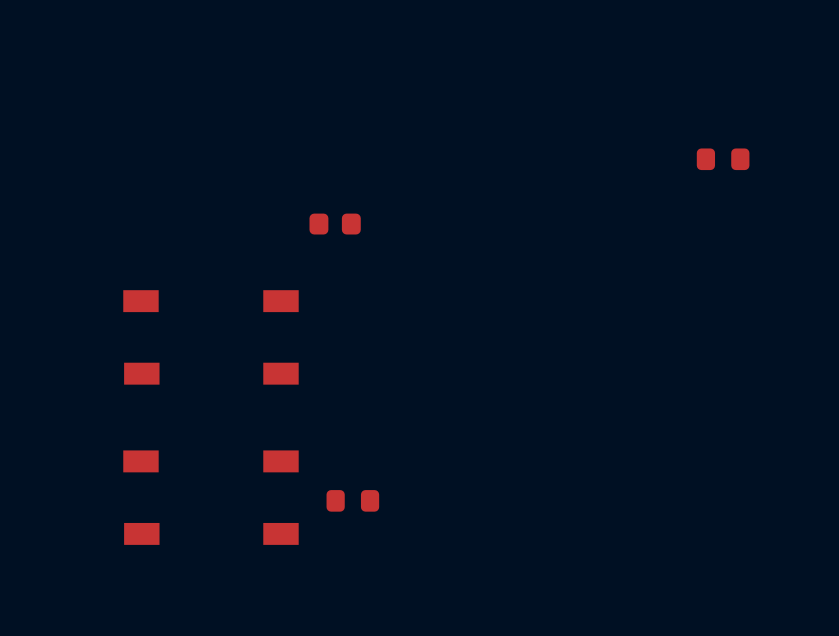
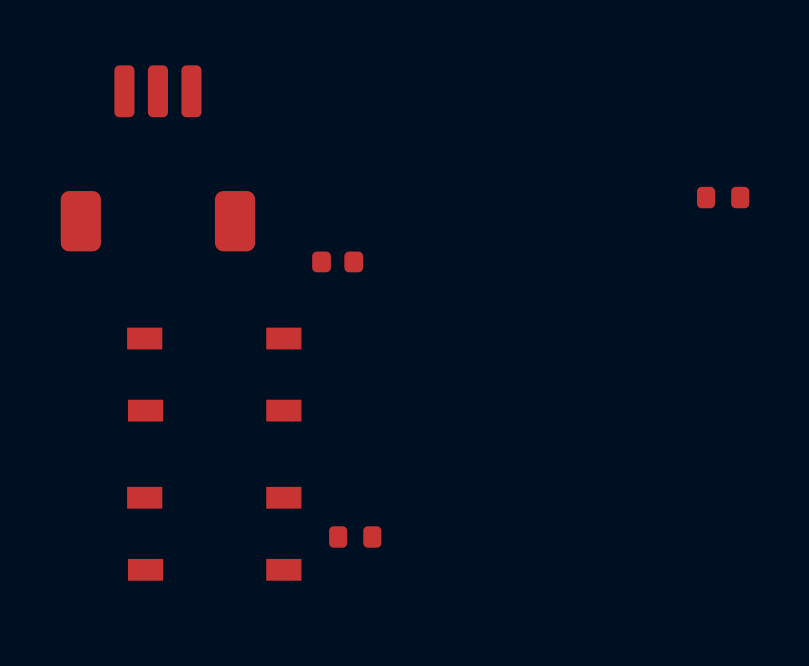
part: none -> (157, 158)

